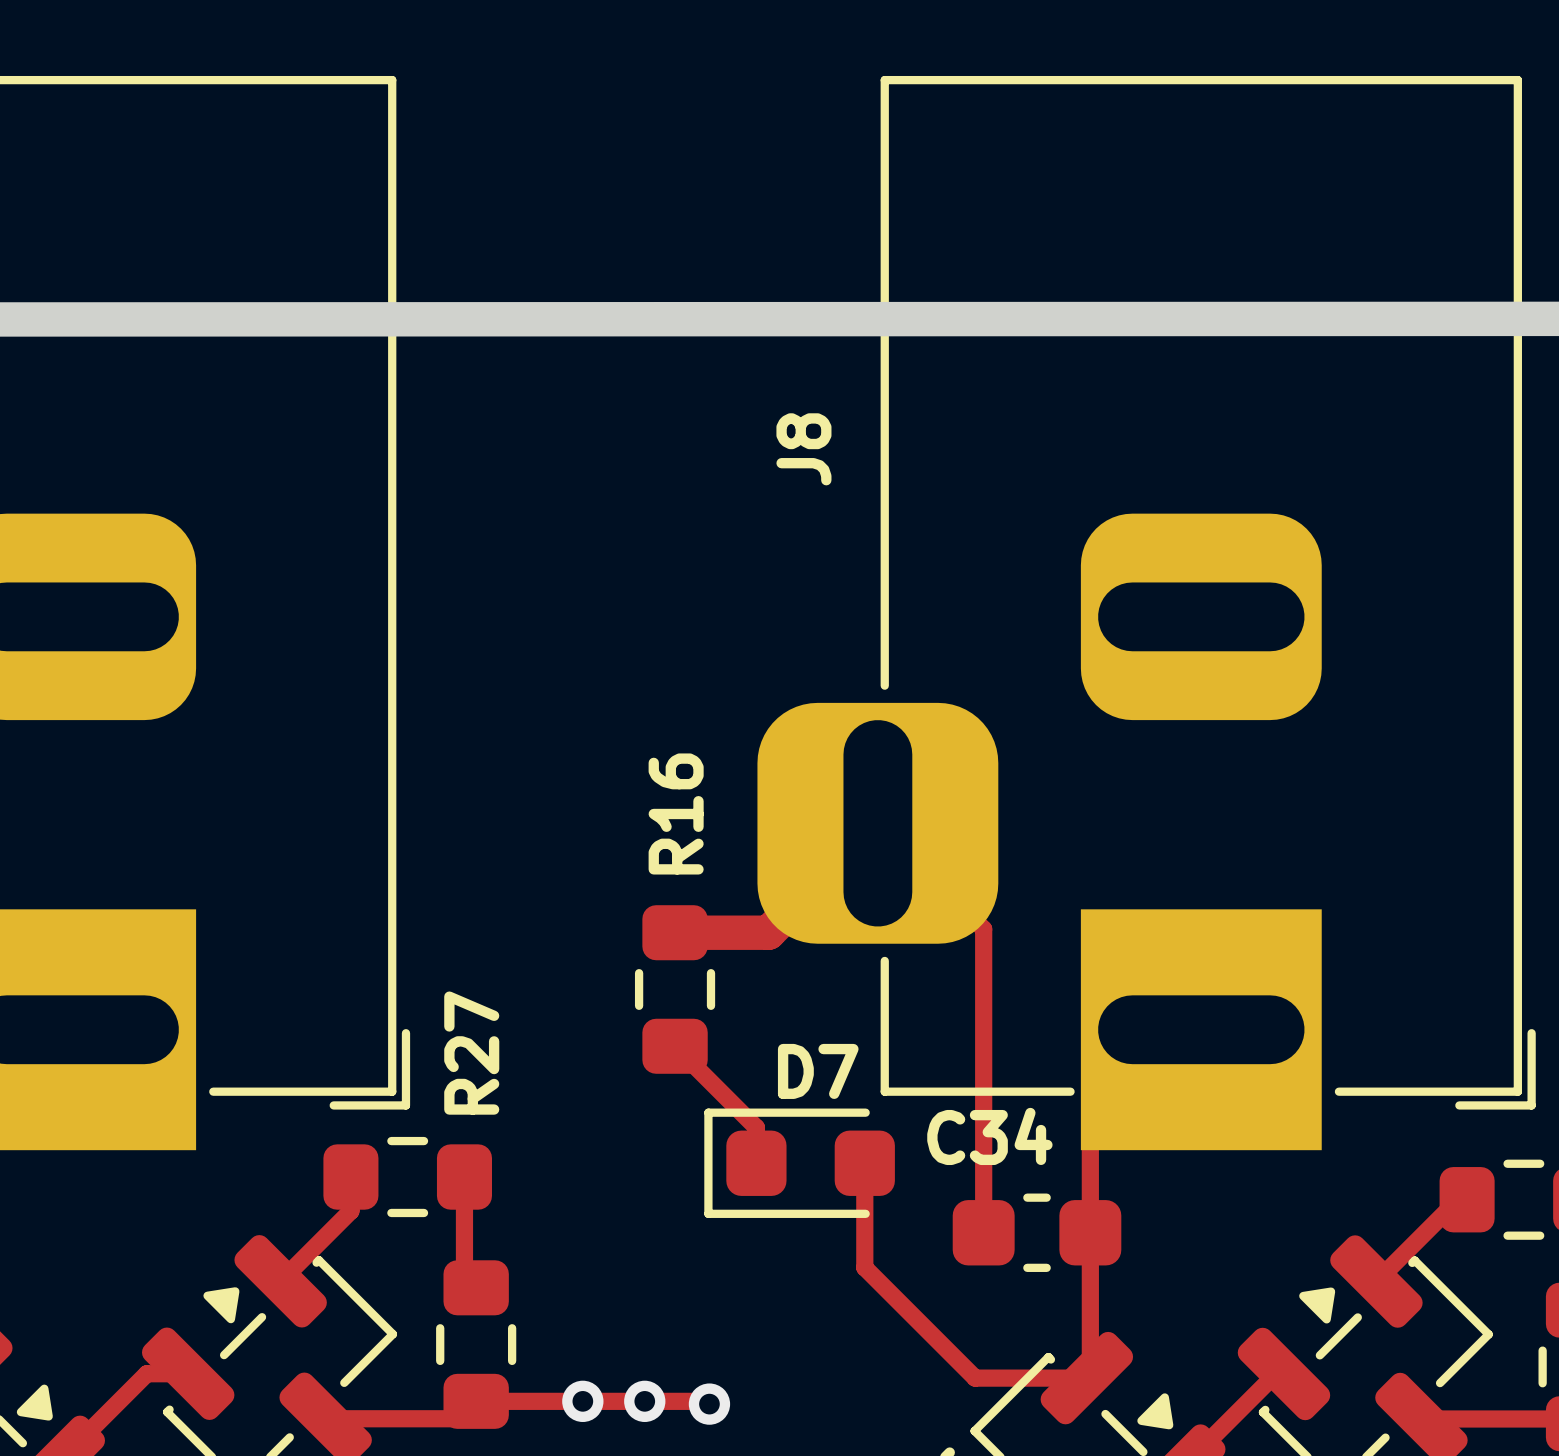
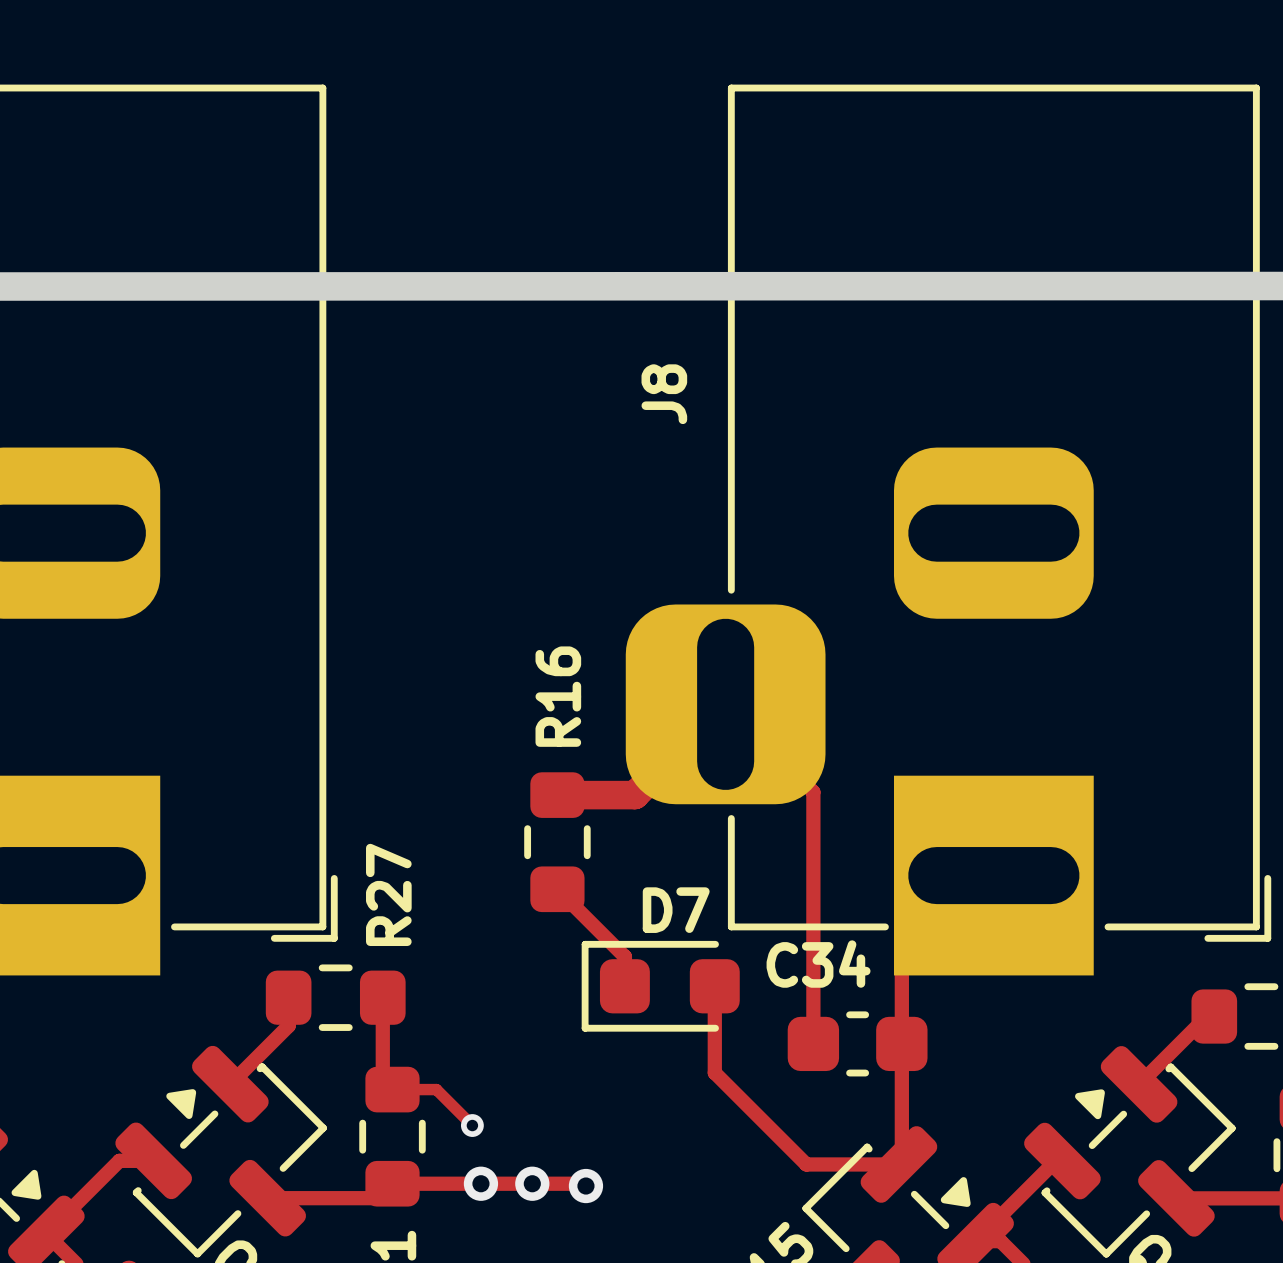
track: none -> (392, 1089) (436, 1089) (472, 1125)
via: none -> (472, 1125)

